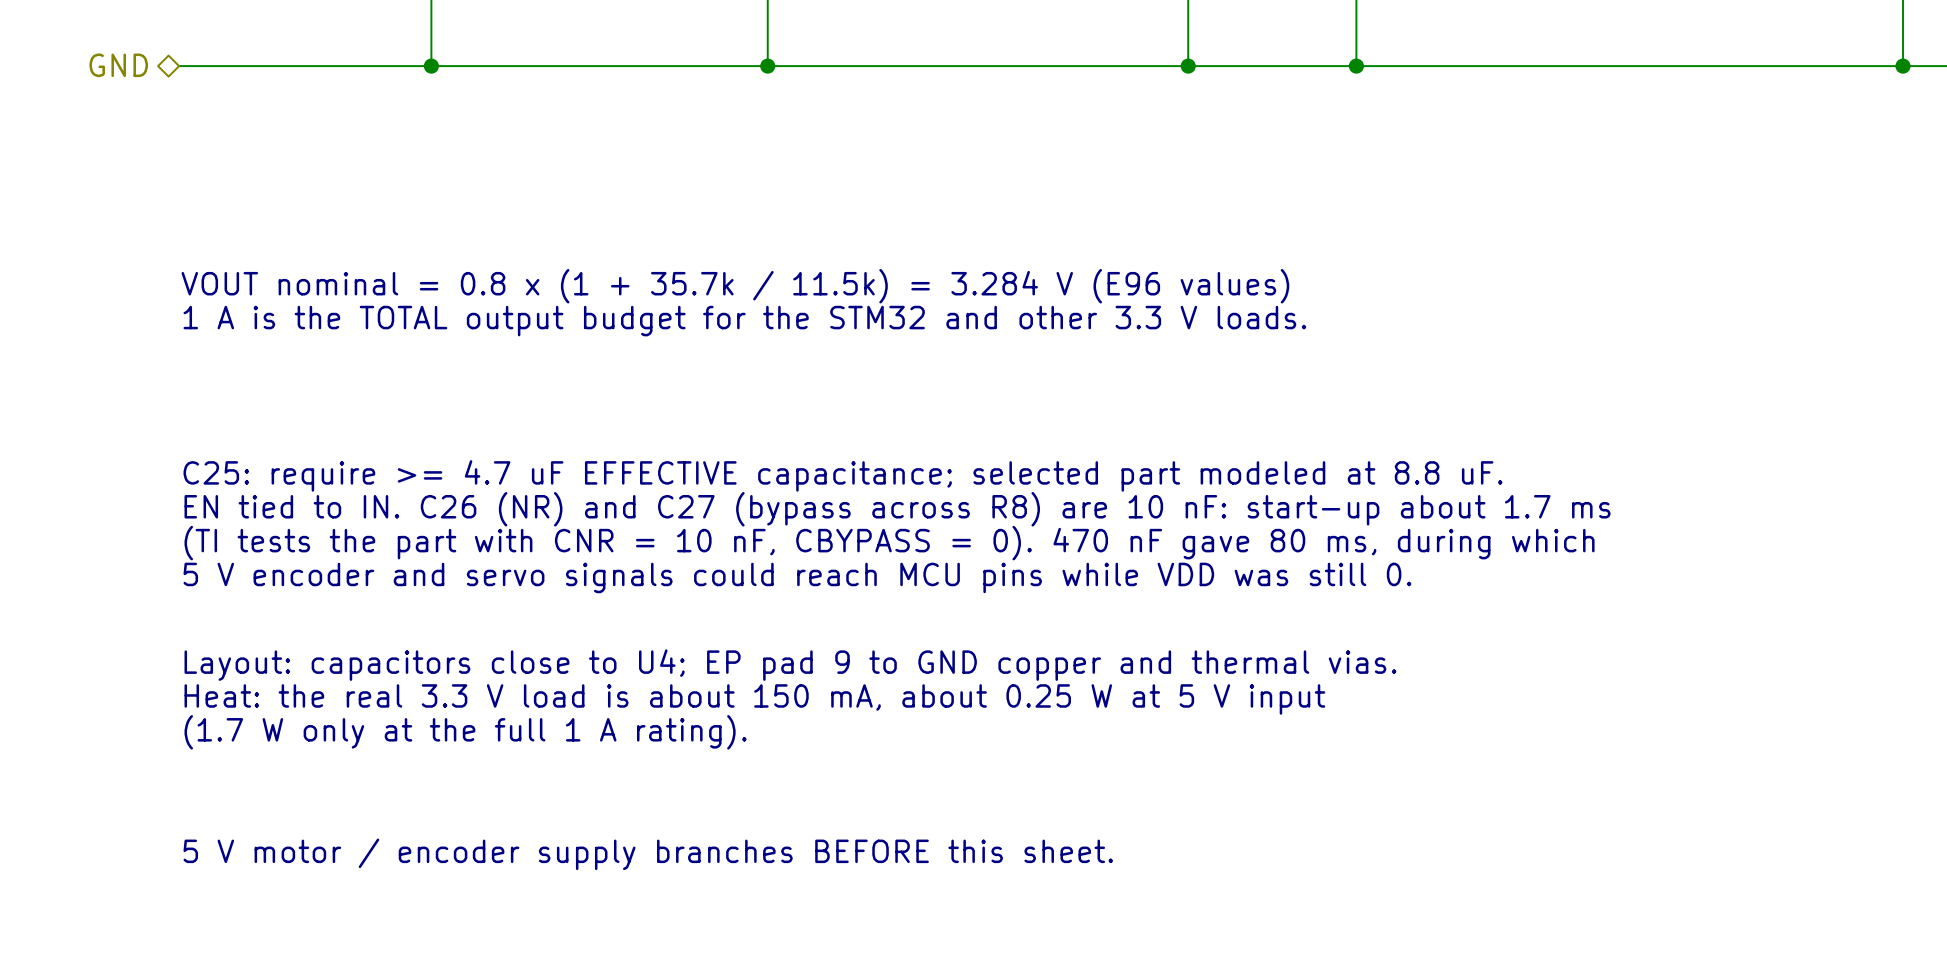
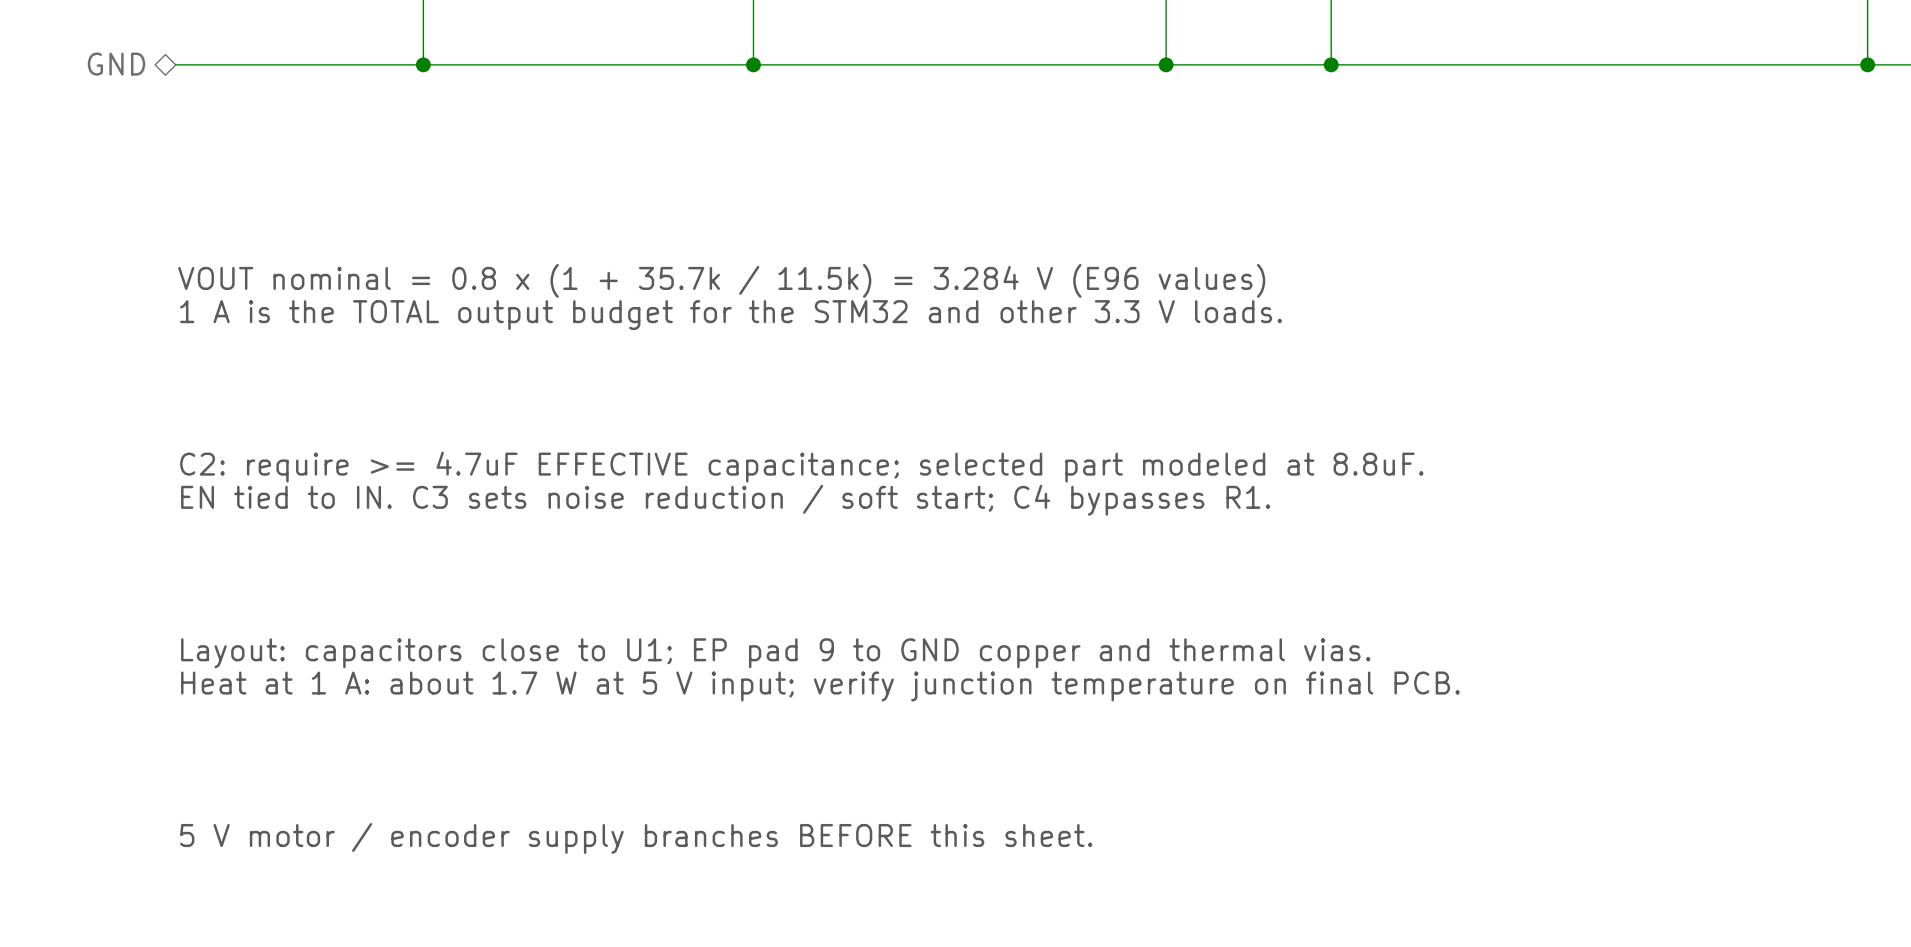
text: C25: require >= 4.7 uF EFFECTIVE capacitance; selected part modeled at 8.8 uF. (842, 475) -> C2: require >= 4.7uF EFFECTIVE capacitance; selected part modeled at 8.8uF. (801, 467)
text: EN tied to IN. C26 (NR) and C27 (bypass across R8) are 10 nF: start-up about 1.7 ms (897, 509) -> EN tied to IN. C3 sets noise reduction / soft start; C4 bypasses R1. (725, 500)
text: (TI tests the part with CNR = 10 nF, CBYPASS = 0). 470 nF gave 80 ms, during which (889, 543) -> none
text: 5 V encoder and servo signals could reach MCU pins while VDD was still 0. (797, 577) -> none
text: Layout: capacitors close to U4; EP pad 9 to GND copper and thermal vias. (790, 665) -> Layout: capacitors close to U1; EP pad 9 to GND copper and thermal vias. (775, 653)
text: Heat: the real 3.3 V load is about 150 mA, about 0.25 W at 5 V input (754, 699) -> Heat at 1 A: about 1.7 W at 5 V input; verify junction temperature on final PCB. (820, 686)
text: (1.7 W only at the full 1 A rating). (465, 732) -> none

